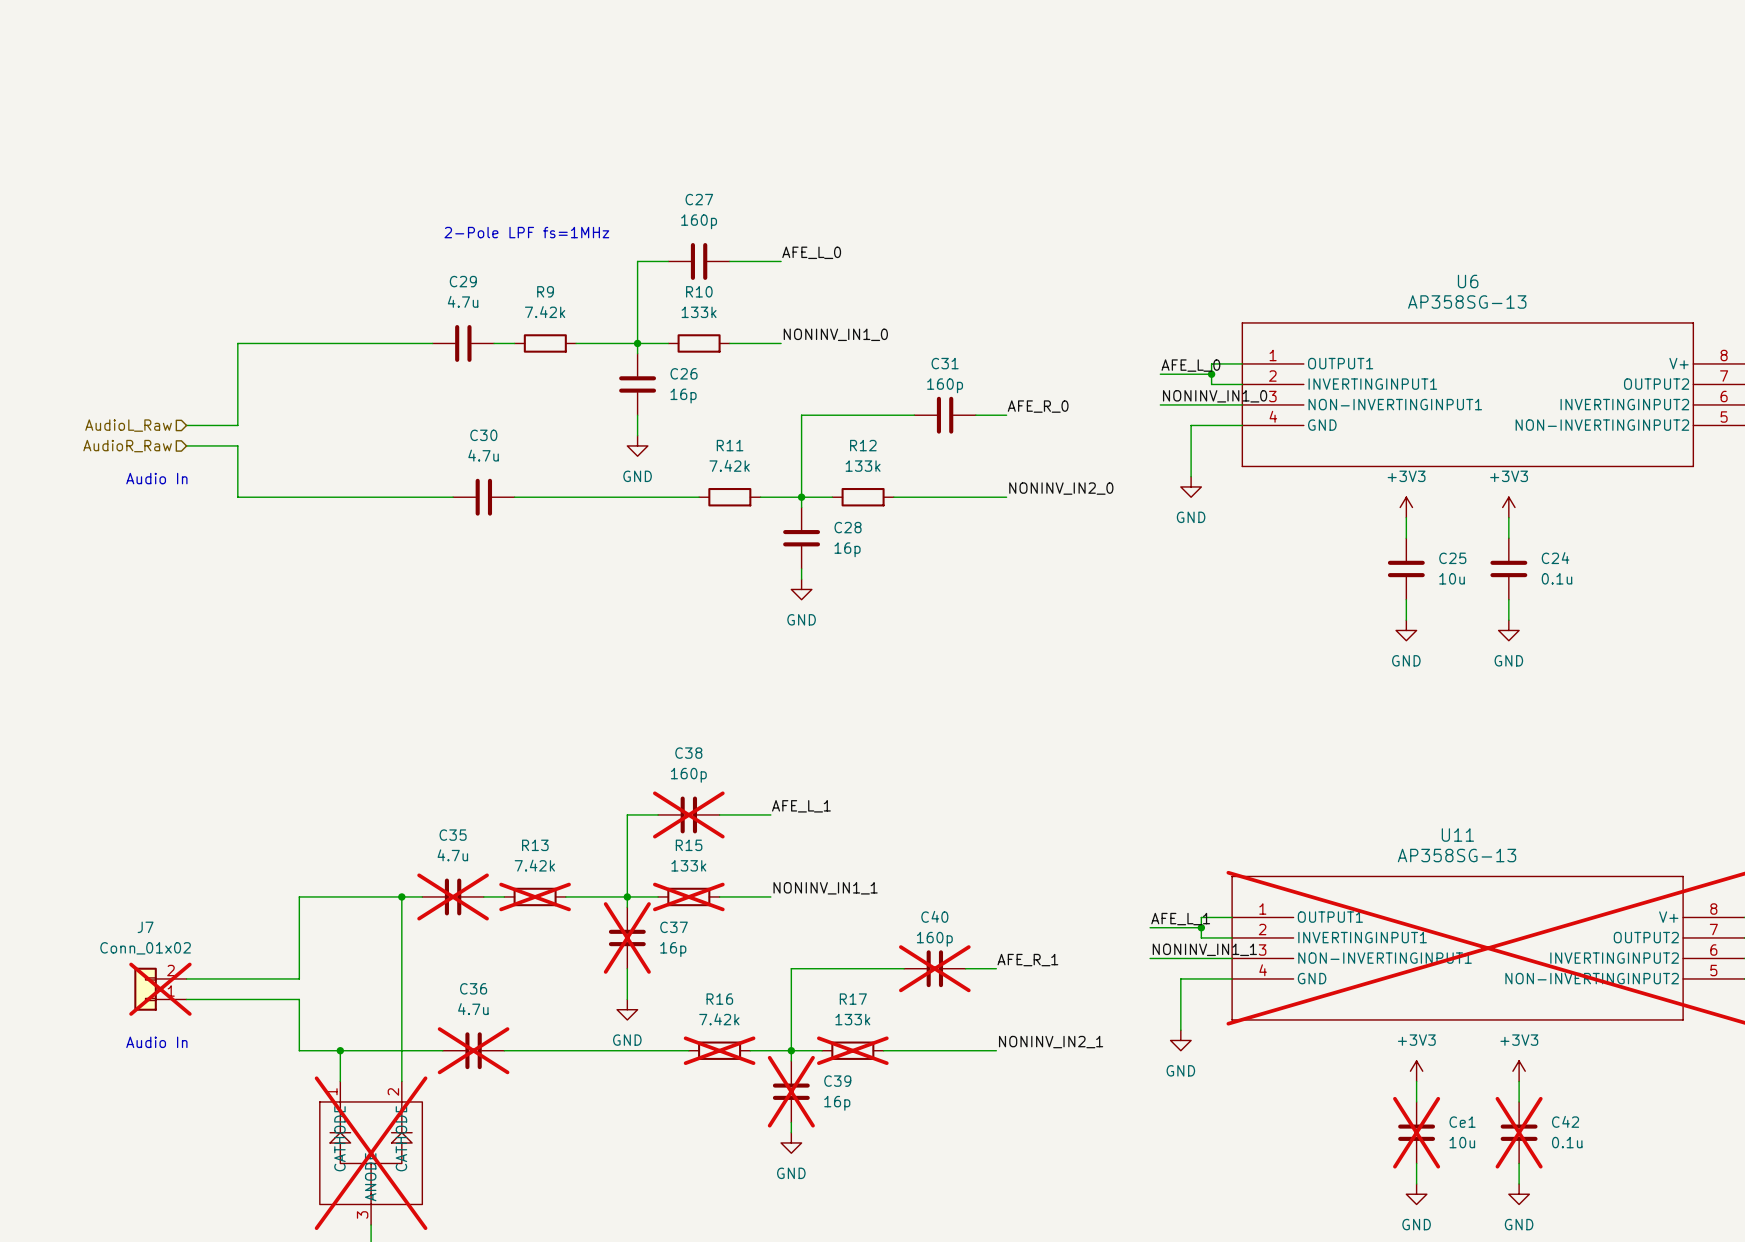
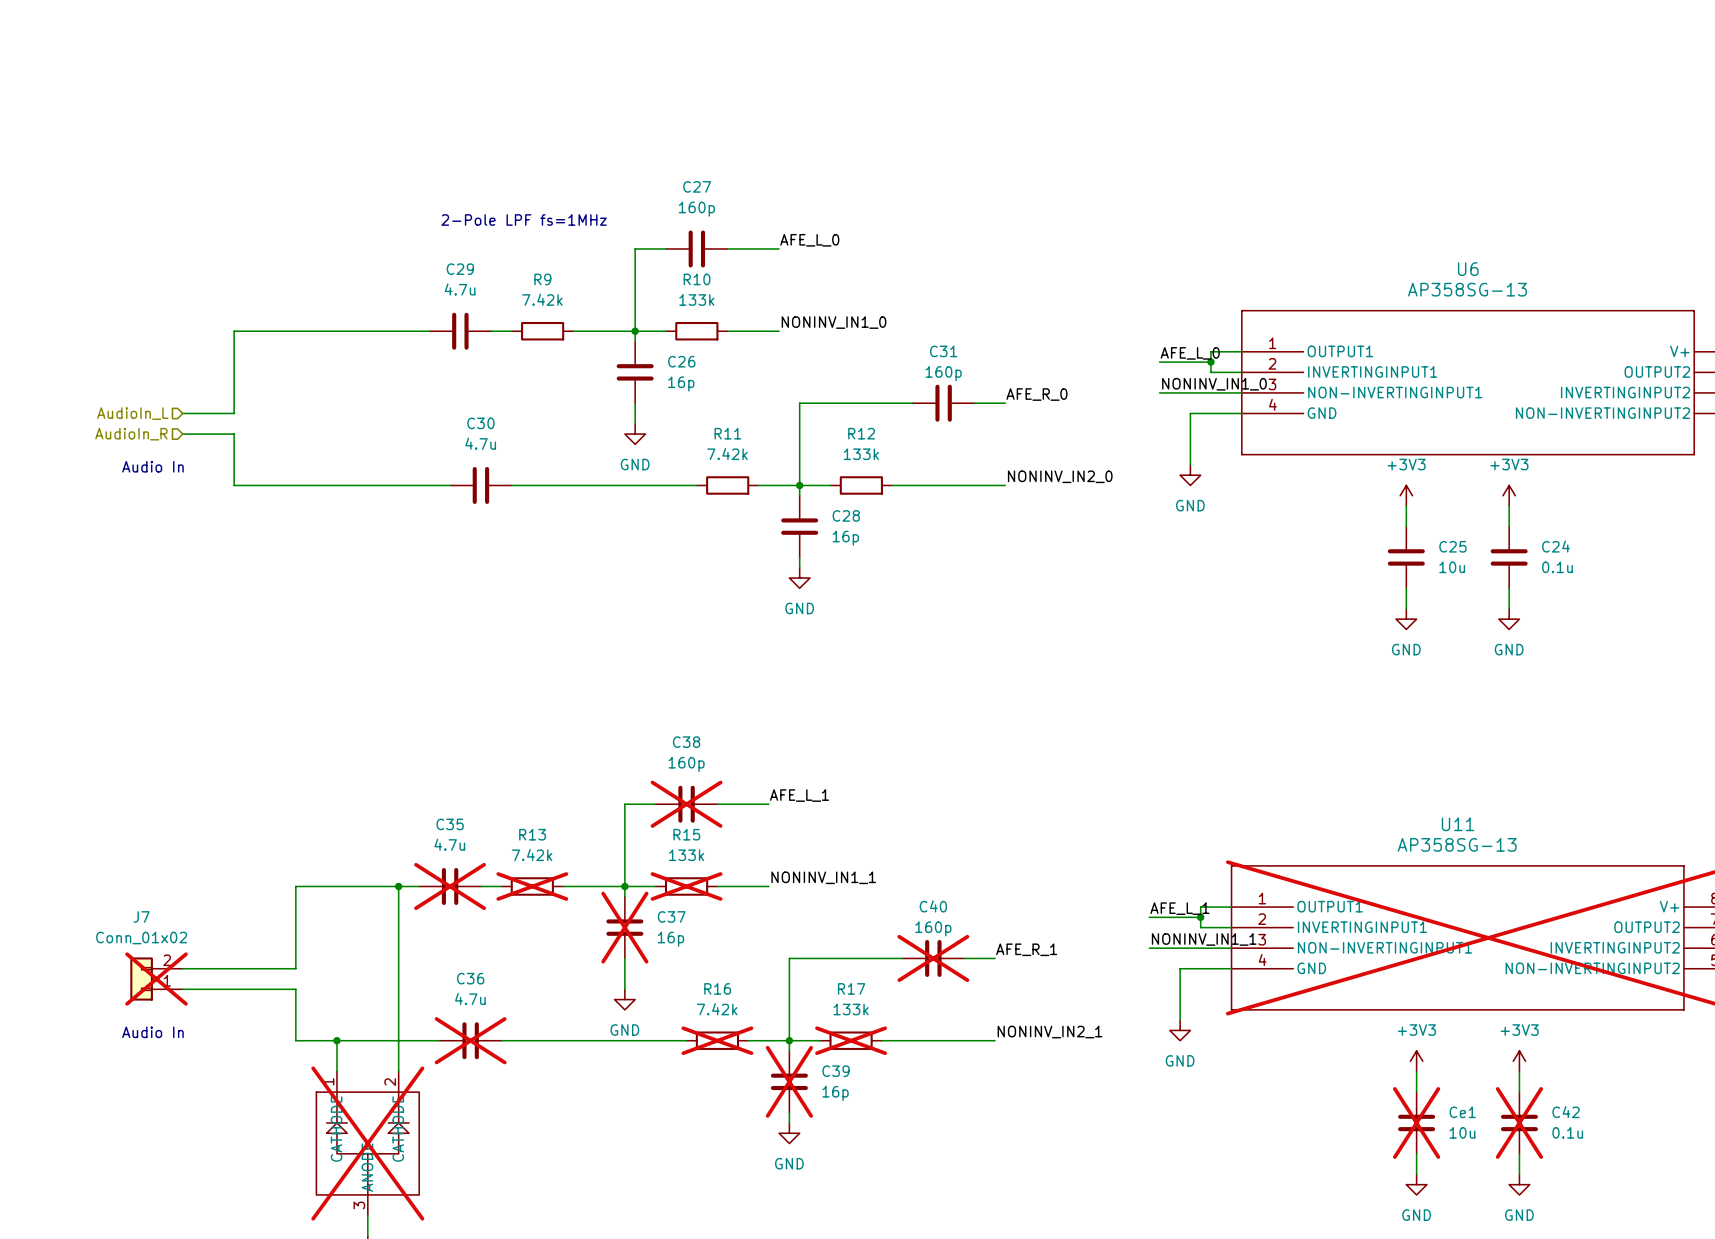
hierarchical label: AudioL_Raw (128, 425) -> AudioIn_L (132, 413)
hierarchical label: AudioR_Raw (127, 446) -> AudioIn_R (131, 434)

